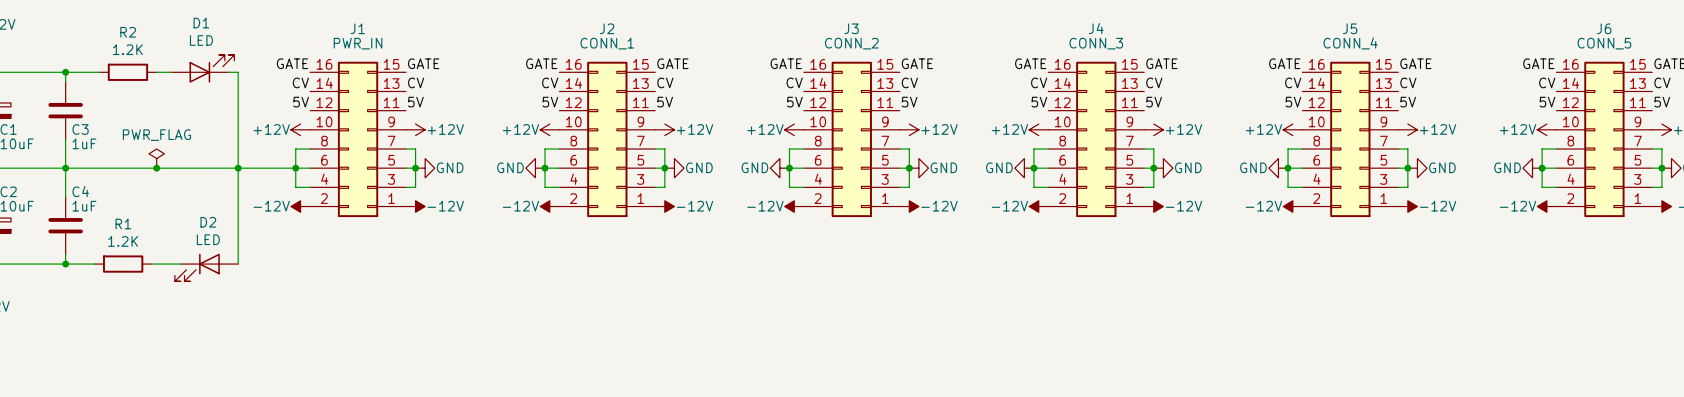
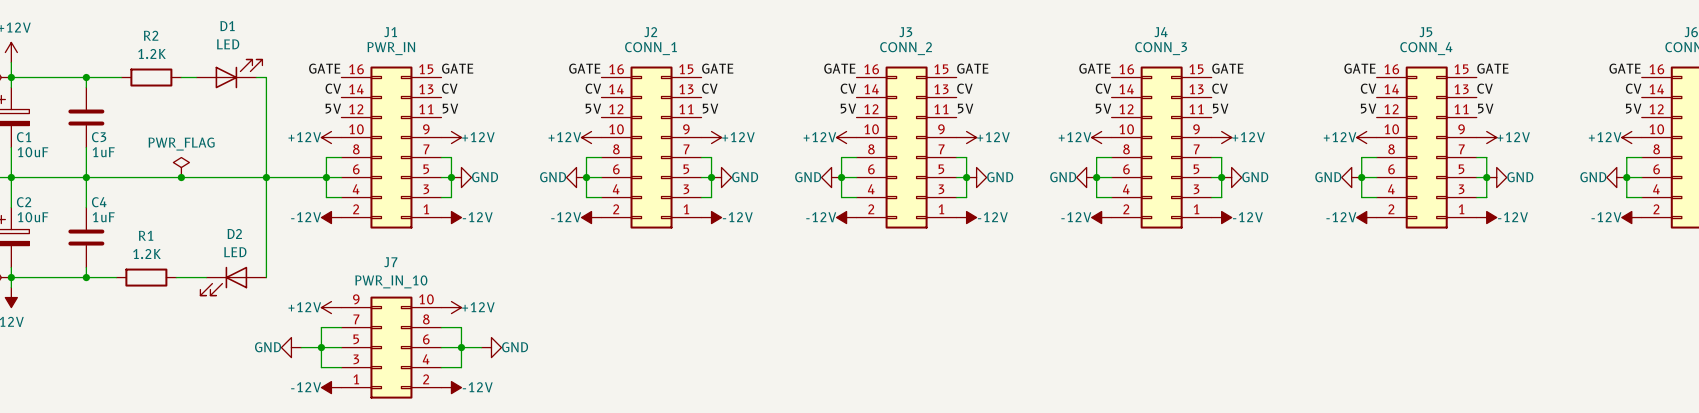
power symbol: none -> +12V (331, 307)
power symbol: none -> +12V (451, 307)
wire: none -> (341, 327) (321, 327) (321, 367) (341, 367)
wire: none -> (441, 327) (461, 327) (461, 367) (441, 367)
power symbol: none -> GND (291, 347)
wire: none -> (301, 347) (341, 347)
junction: none -> (321, 347)
J7: none -> PWR_IN_10 (391, 347)
wire: none -> (441, 347) (481, 347)
junction: none -> (461, 347)
power symbol: none -> GND (491, 347)
power symbol: none -> -12V (331, 387)
power symbol: none -> -12V (451, 387)

